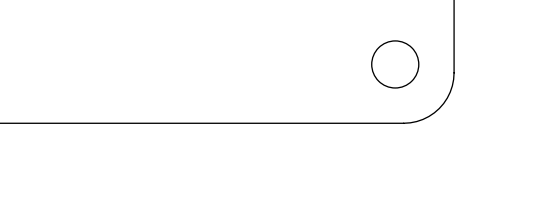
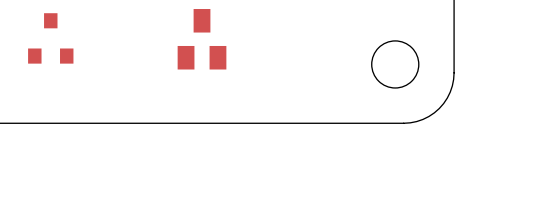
part: none -> (50, 38)
part: none -> (202, 39)

